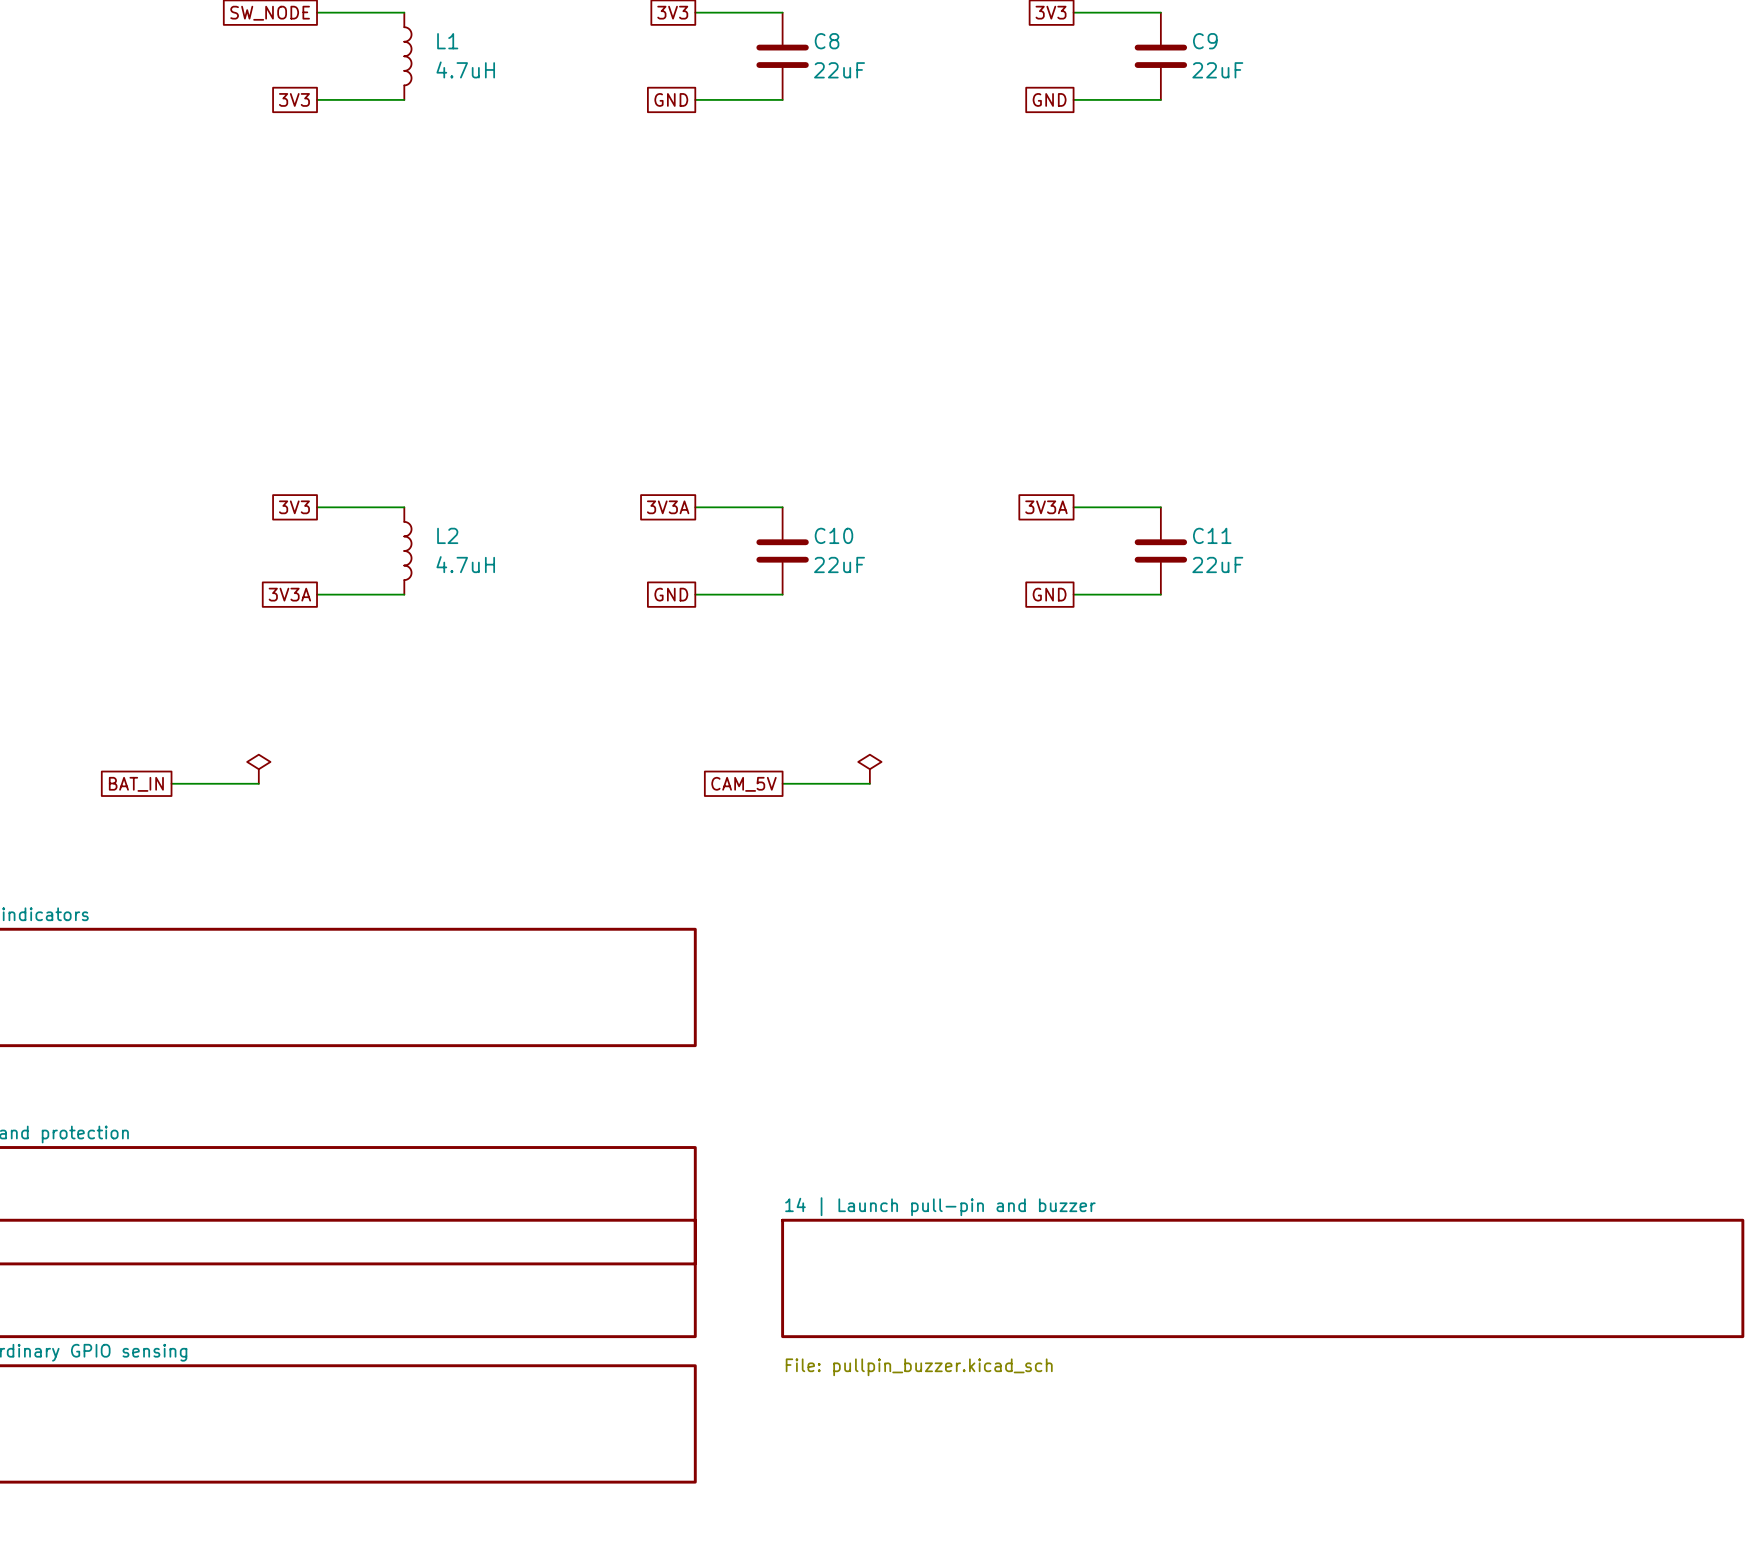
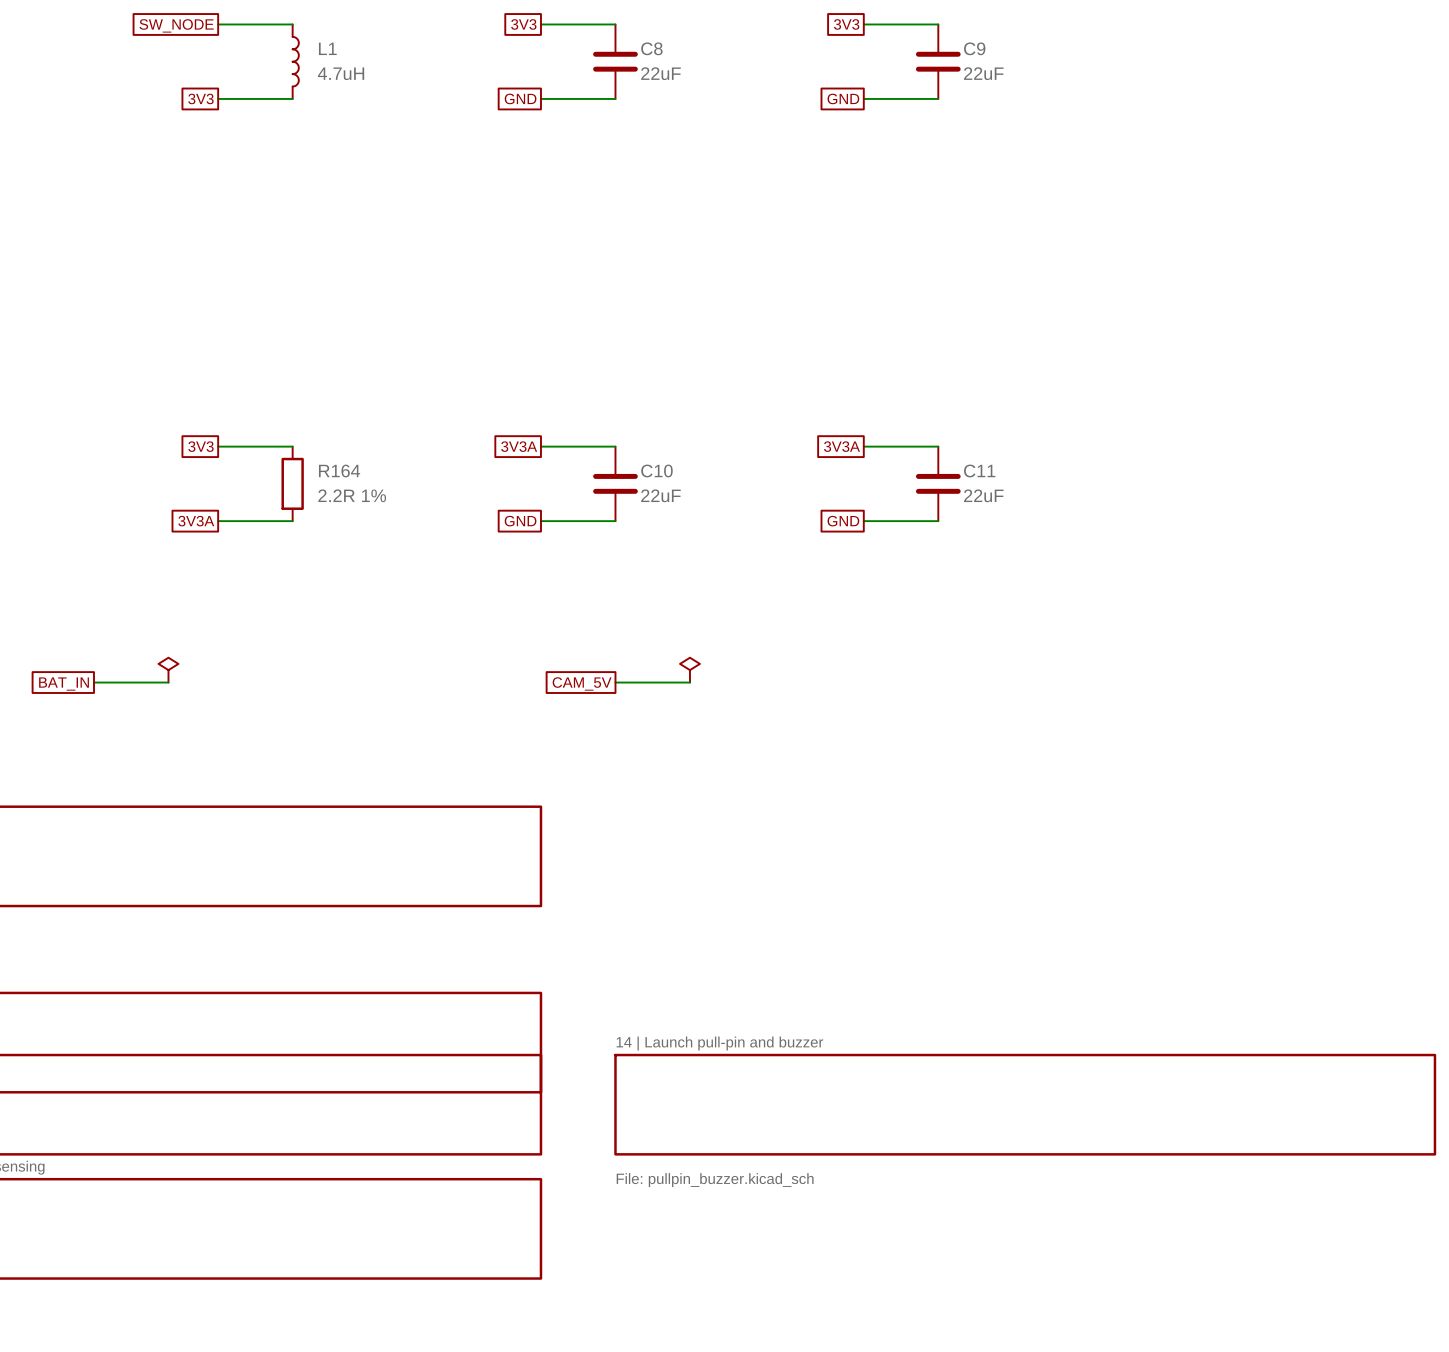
R164: none -> 2.2R 1% (292, 483)
L2: 4.7uH (407, 550) -> none

